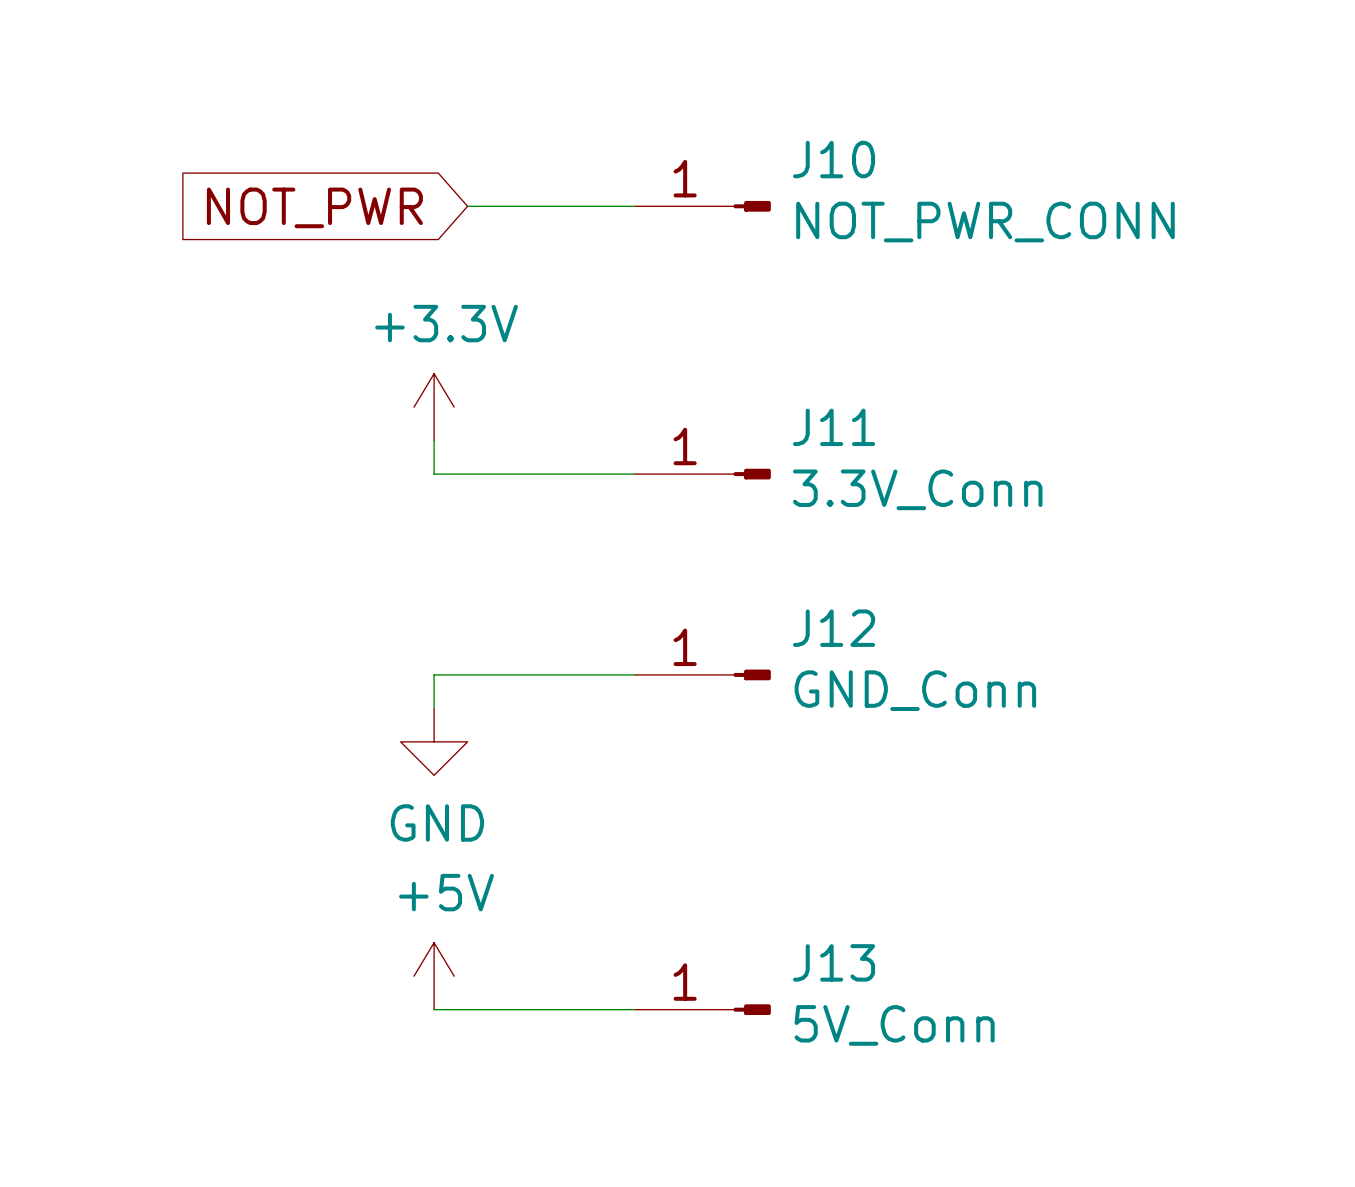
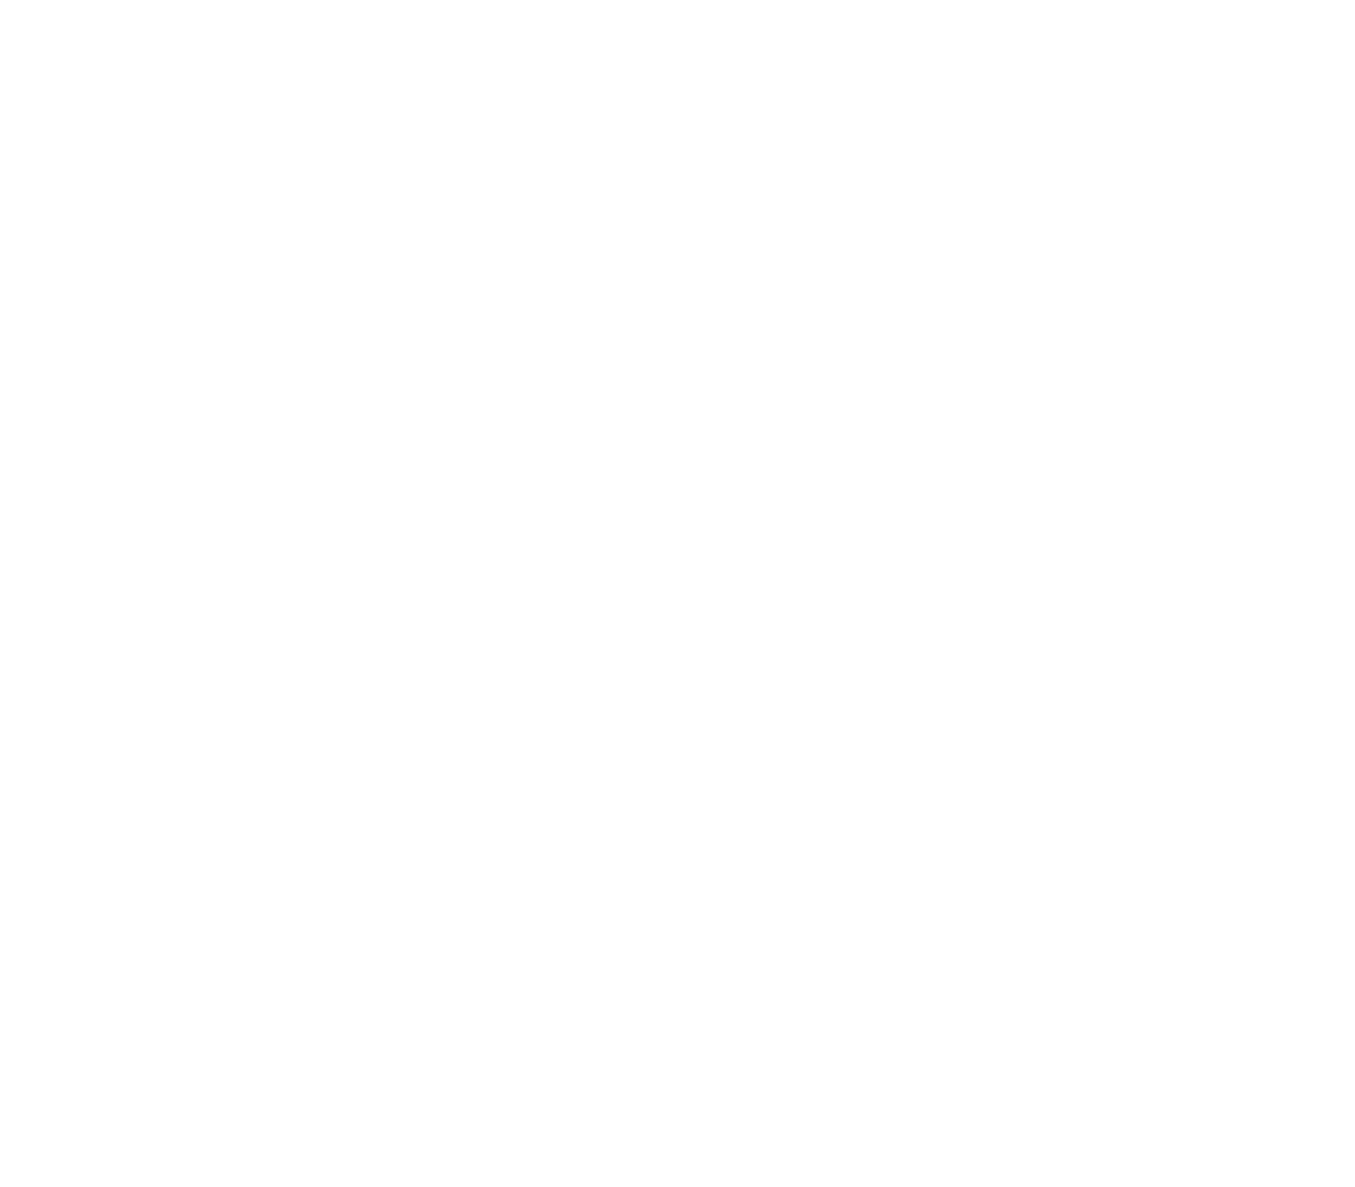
wire: (467, 206) (634, 206) -> none
J10: NOT_PWR_CONN (702, 206) -> none
global label: NOT_PWR (314, 207) -> none
power symbol: +3.3V (434, 407) -> none
wire: (434, 440) (434, 474) (634, 474) -> none
J11: 3.3V_Conn (702, 474) -> none
wire: (634, 674) (434, 674) (434, 708) -> none
J12: GND_Conn (702, 674) -> none
power symbol: GND (434, 741) -> none
power symbol: +5V (434, 976) -> none
wire: (434, 1009) (634, 1009) -> none
J13: 5V_Conn (702, 1009) -> none

